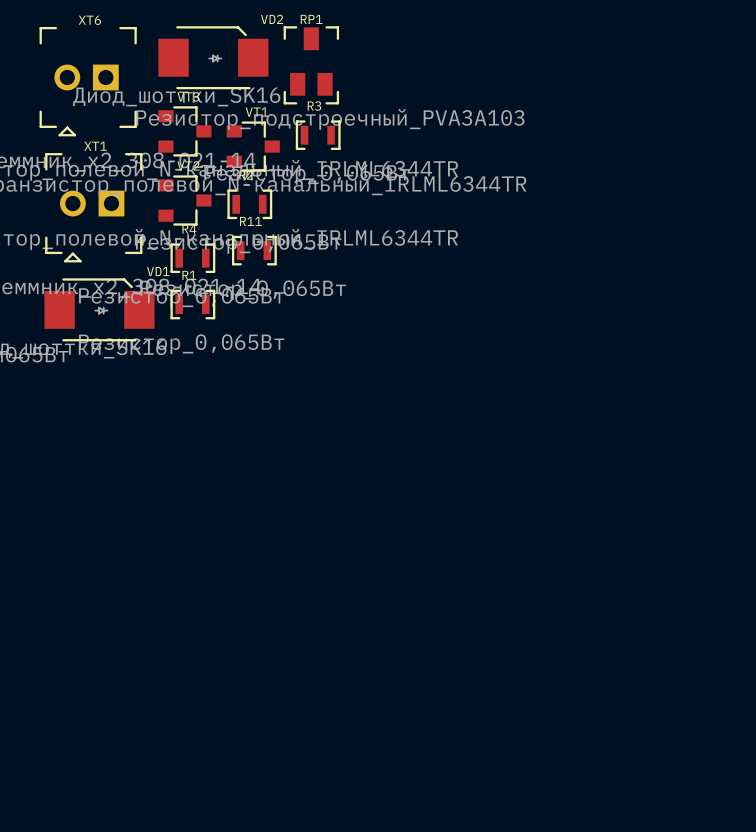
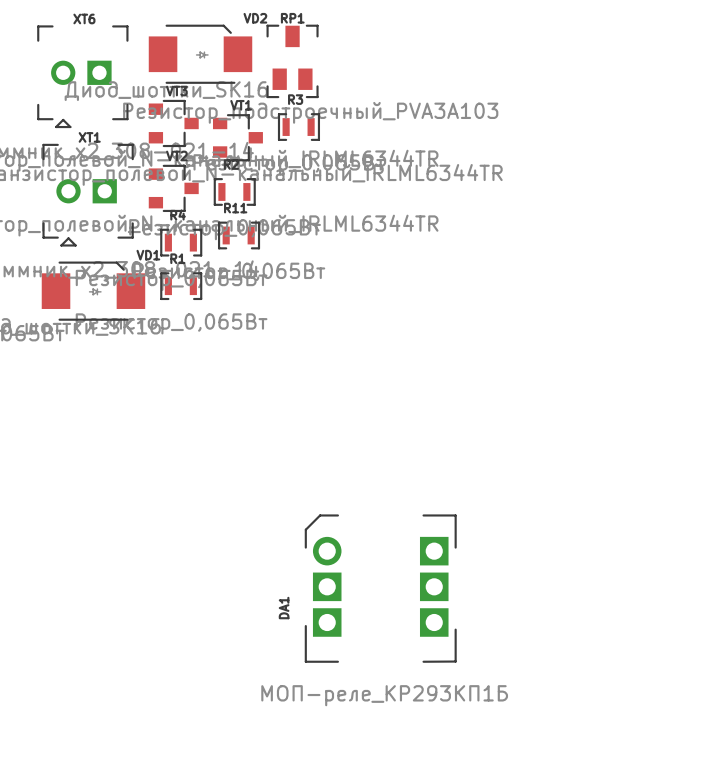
DA1: none -> МОП-реле_КР293КП1Б (380, 588)

